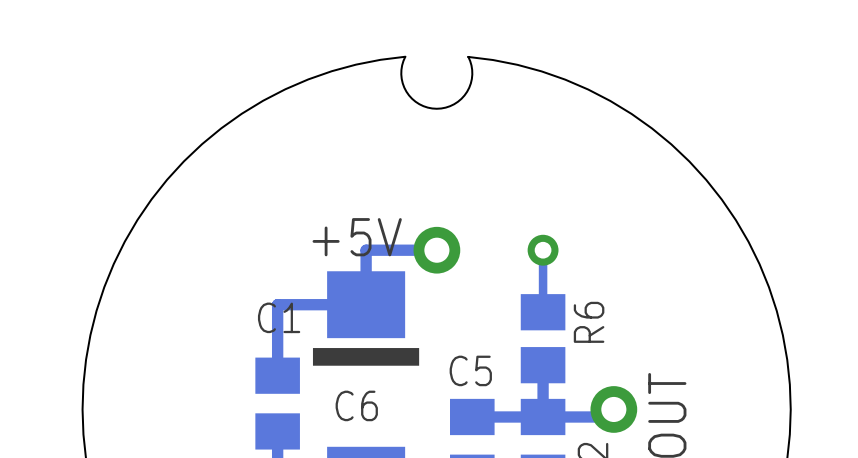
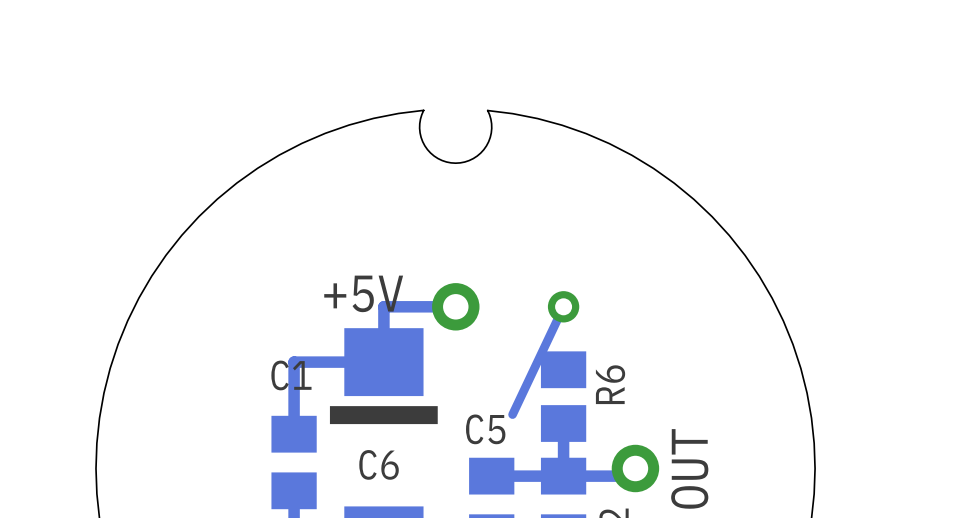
track: (543, 250) (543, 312) -> (563, 306) (512, 414)

